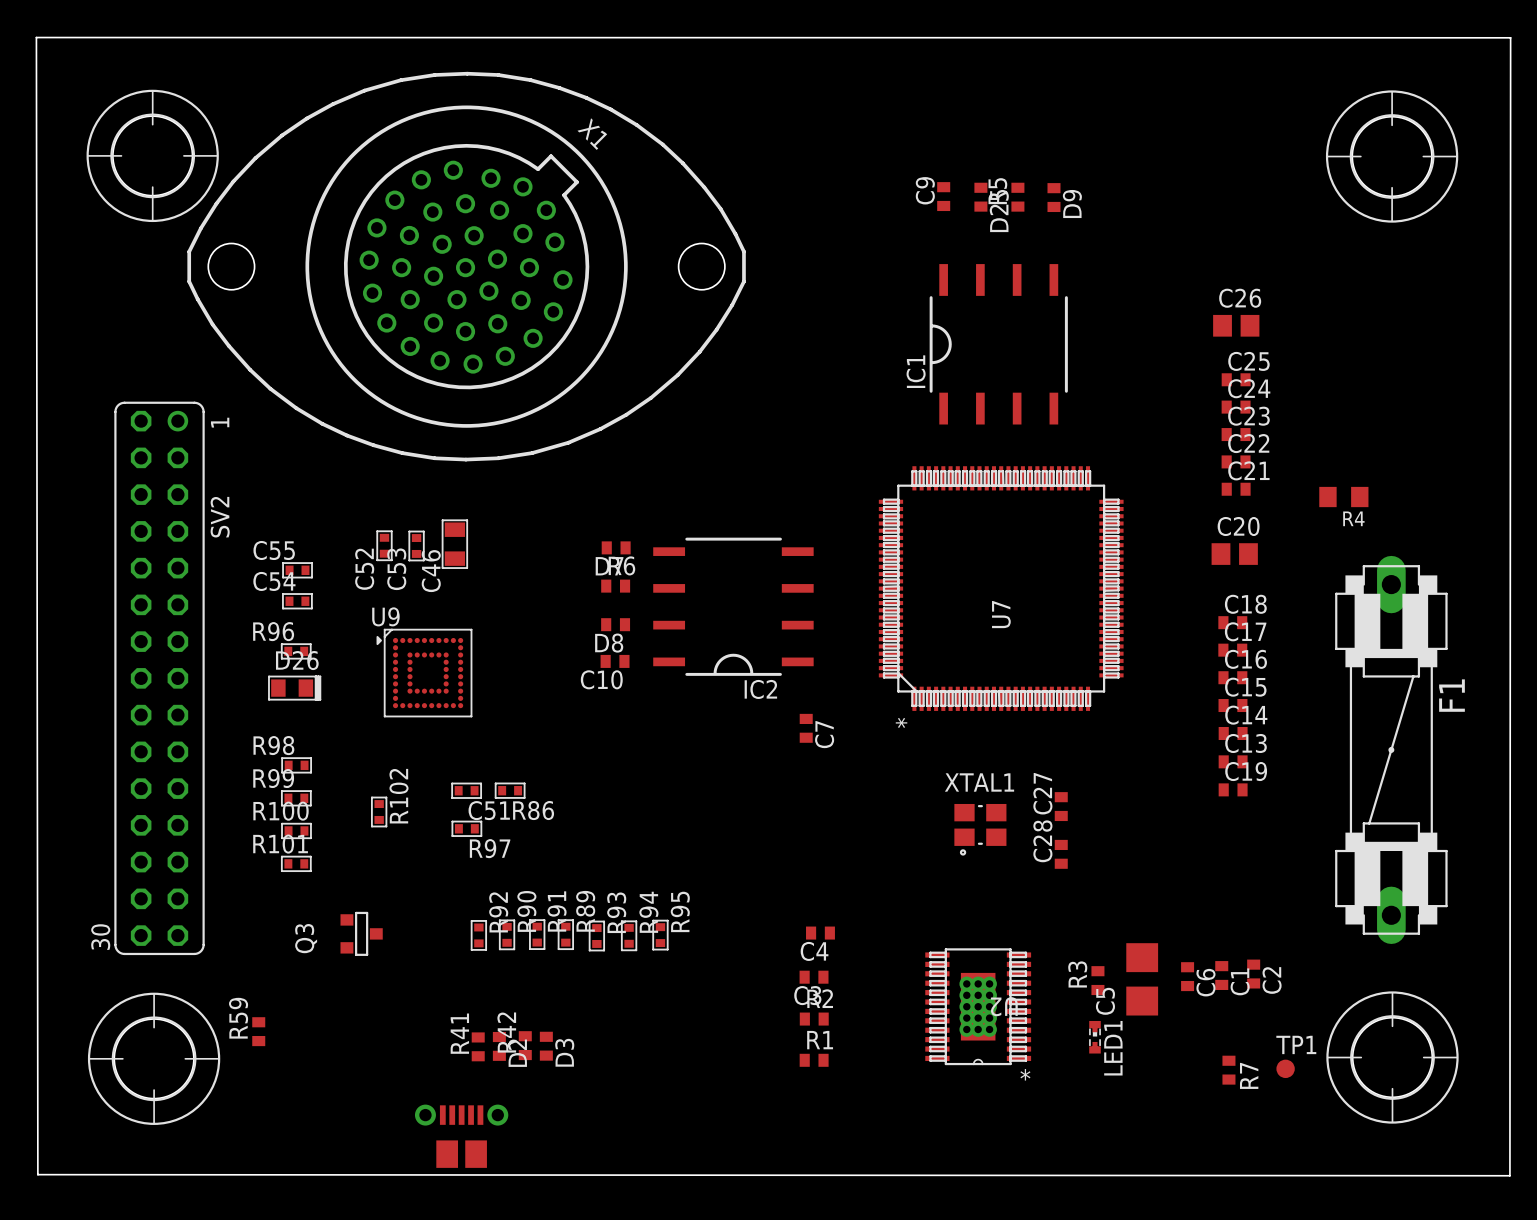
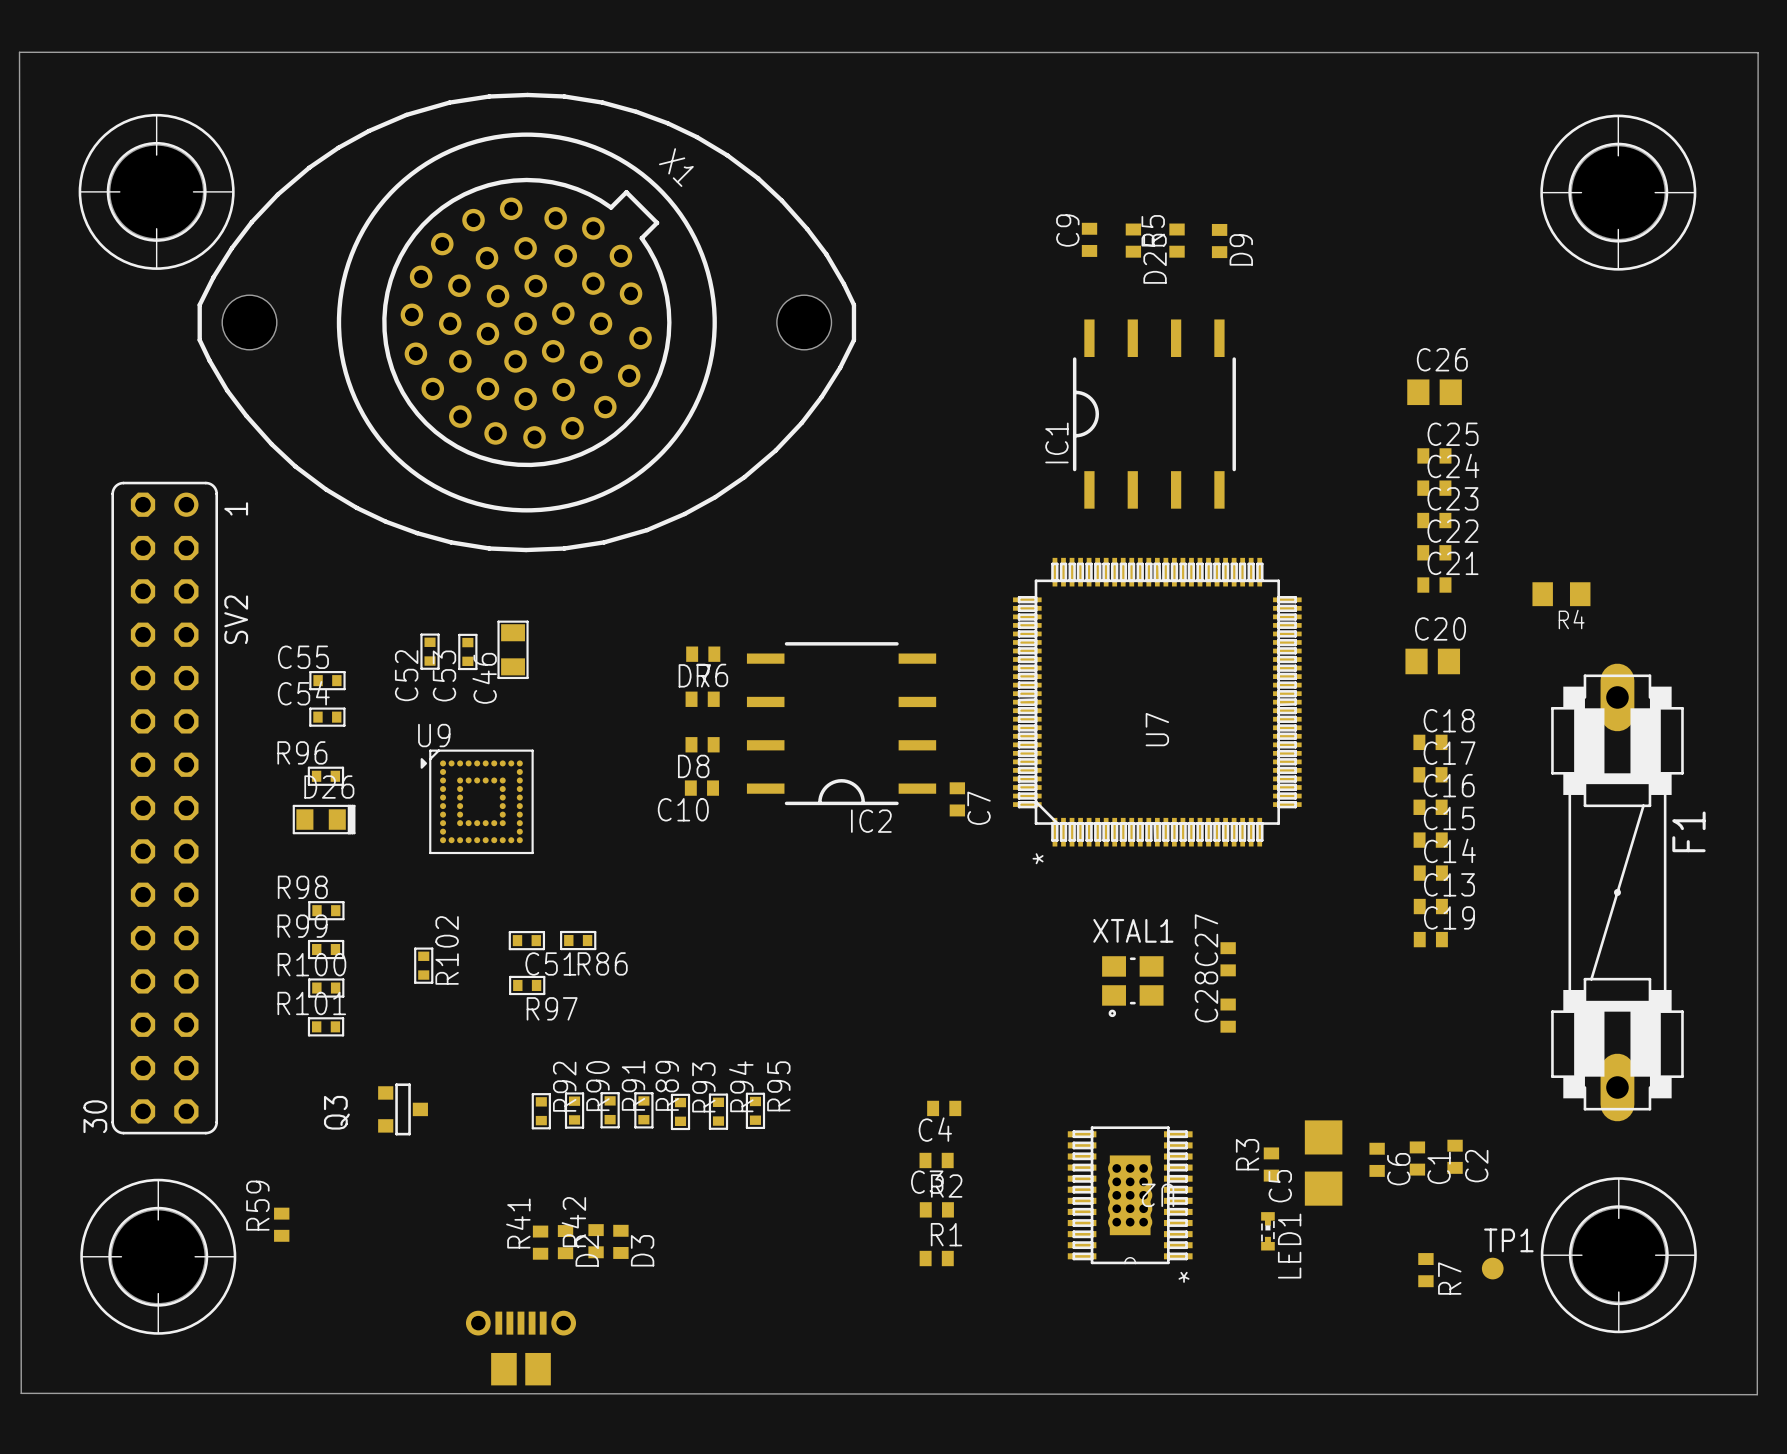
C7 position: (806, 728) -> (957, 799)

